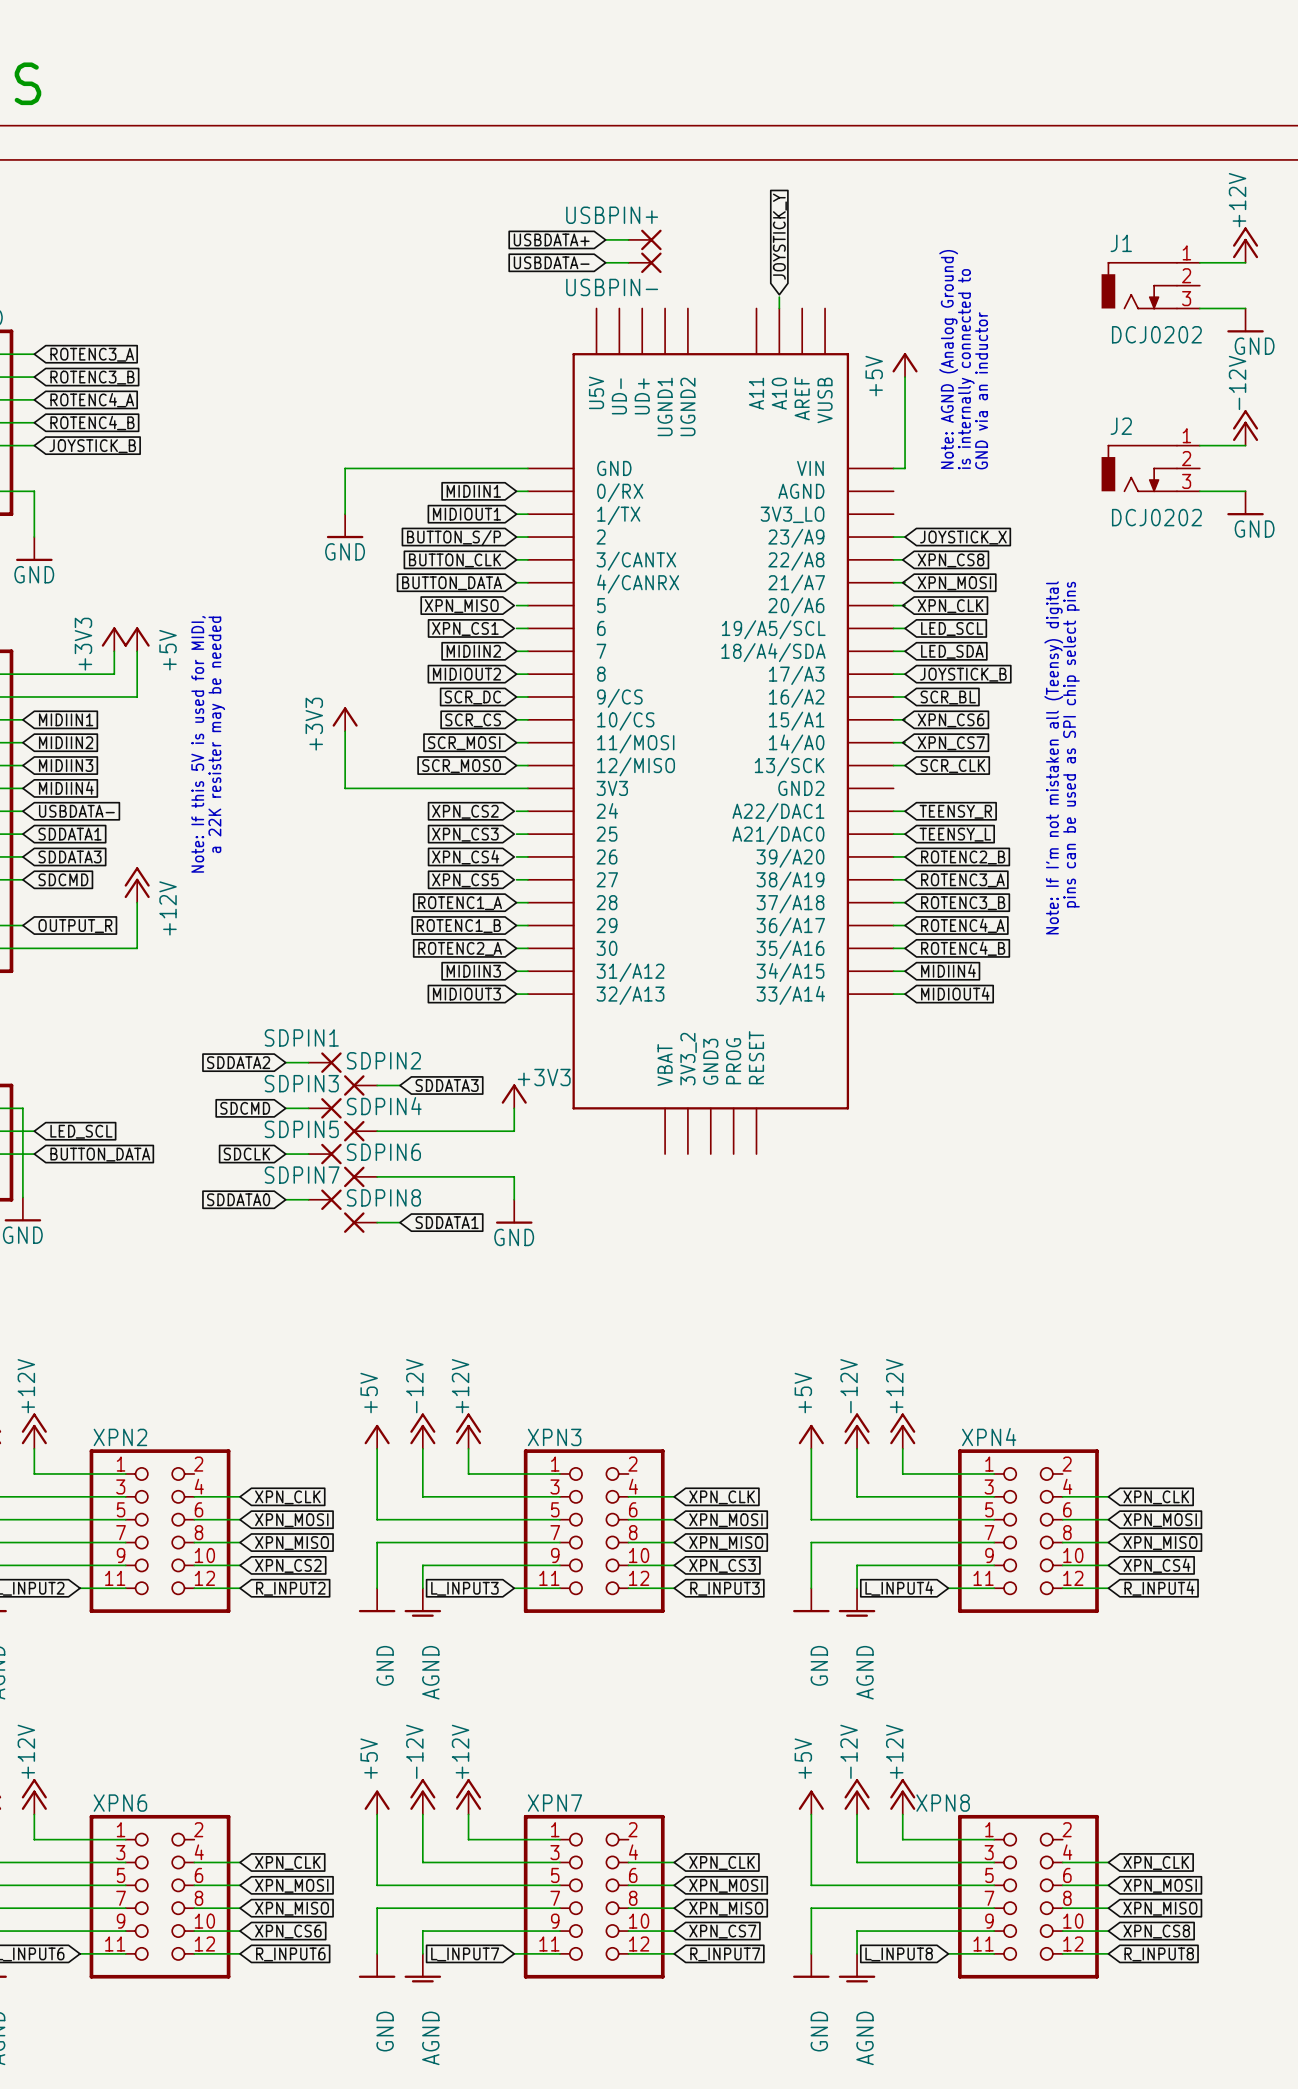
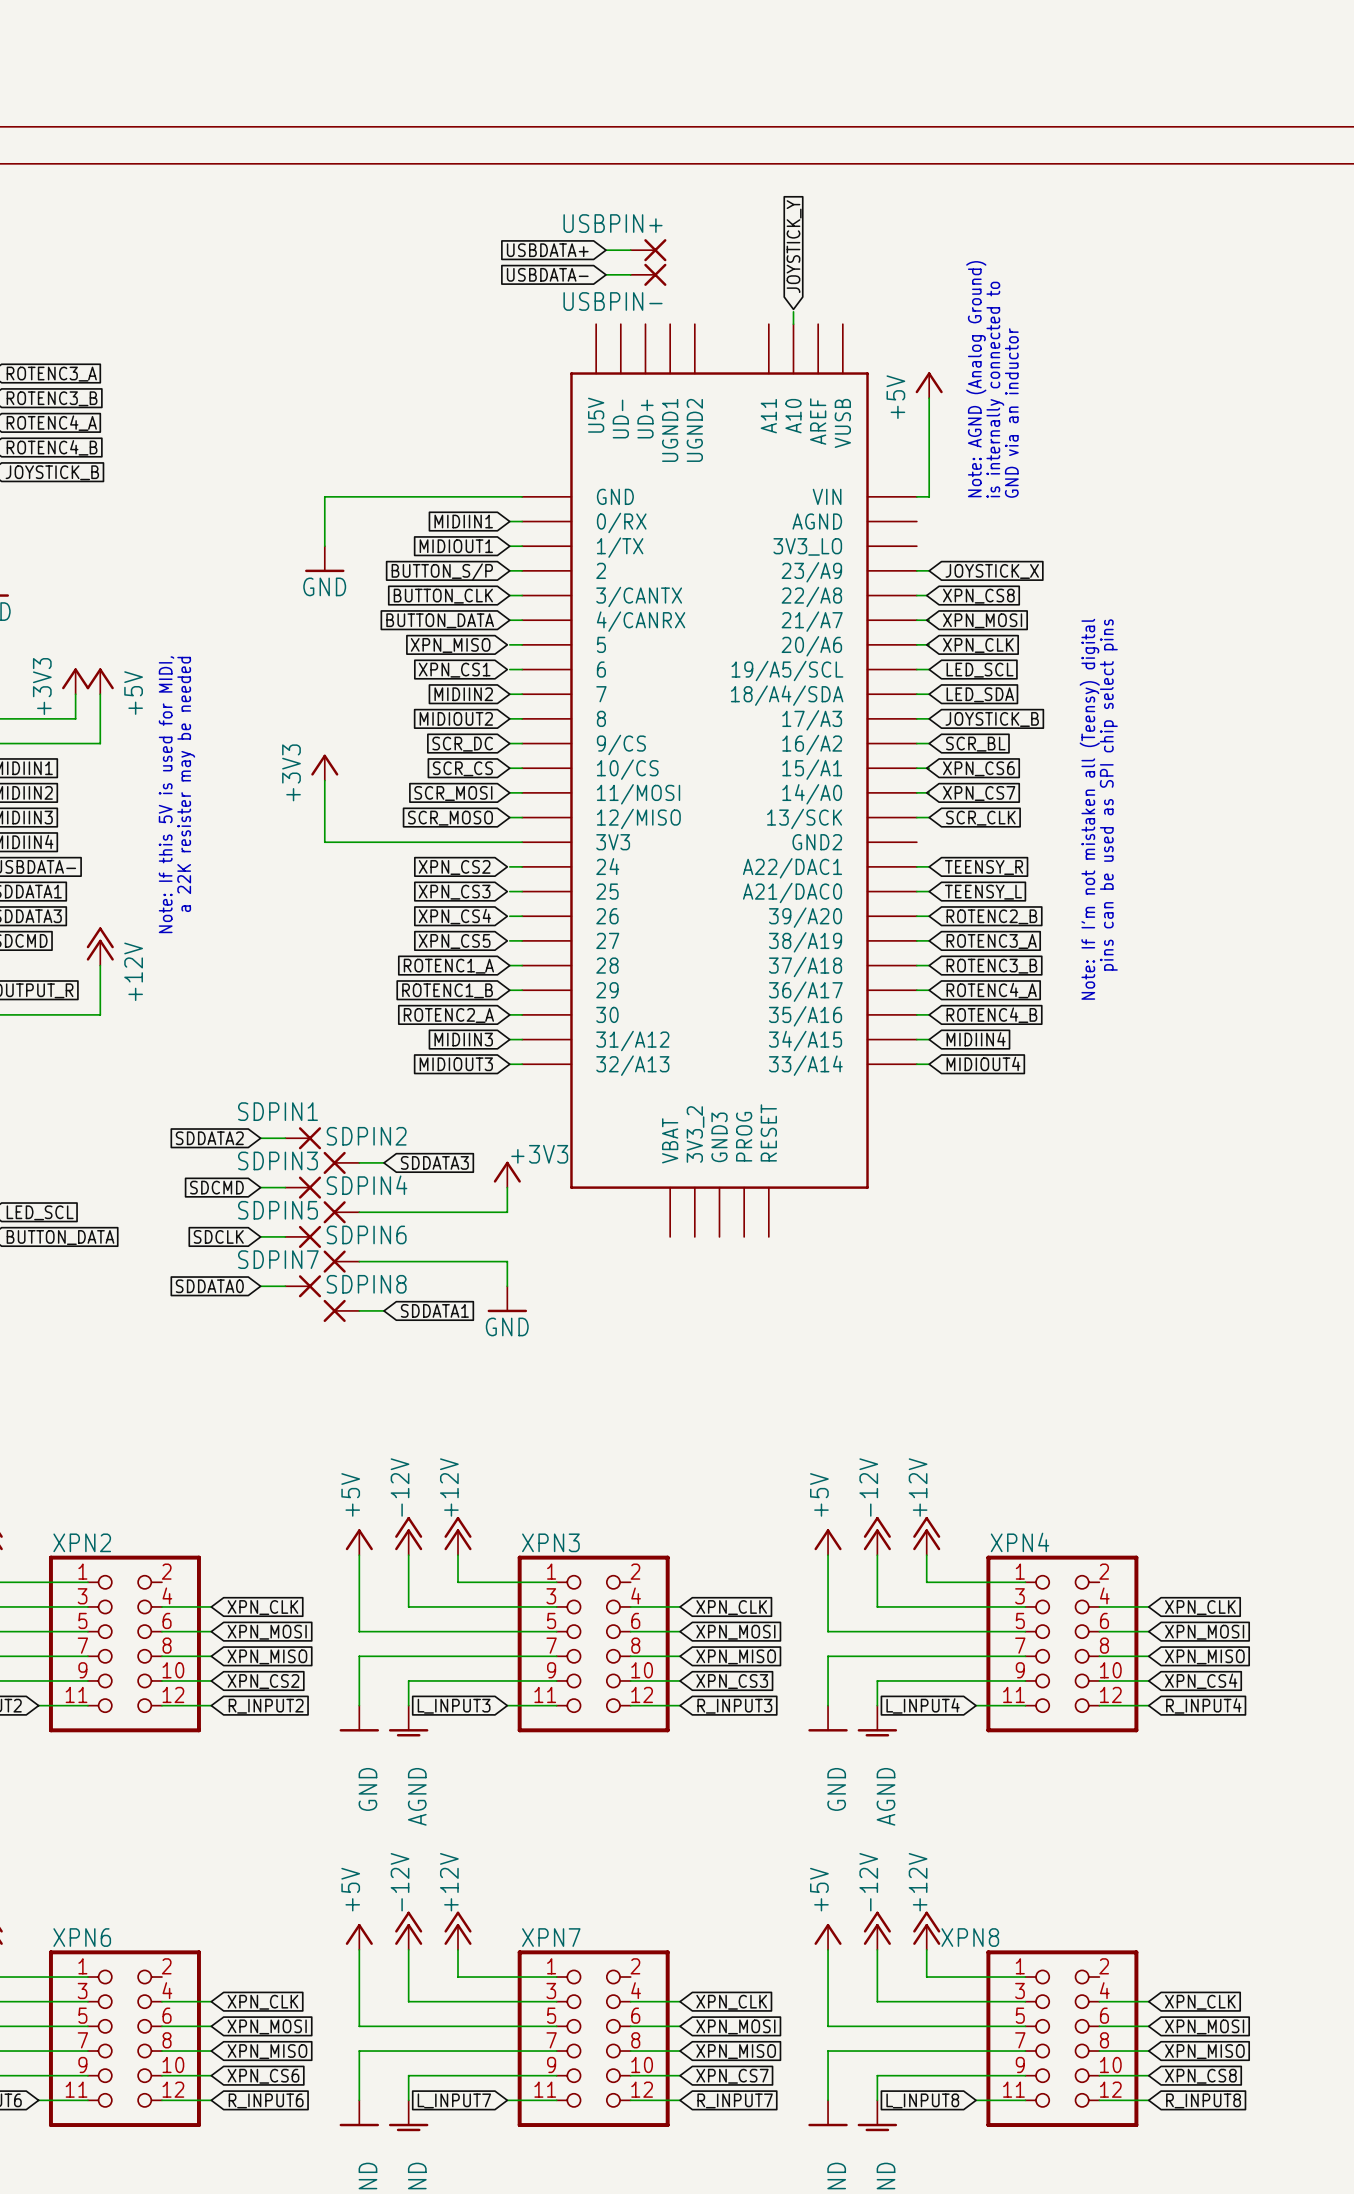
power symbol: +12V (1245, 245) -> none
wire: (1199, 262) (1245, 262) -> none
J1: DCJ0202 (1150, 285) -> none
wire: (1199, 308) (1245, 308) -> none
power symbol: GND (1245, 320) -> none
power symbol: -12V (1245, 427) -> none
wire: (1199, 445) (1245, 445) -> none
J2: DCJ0202 (1150, 468) -> none
wire: (1199, 491) (1245, 491) -> none
power symbol: GND (1245, 503) -> none

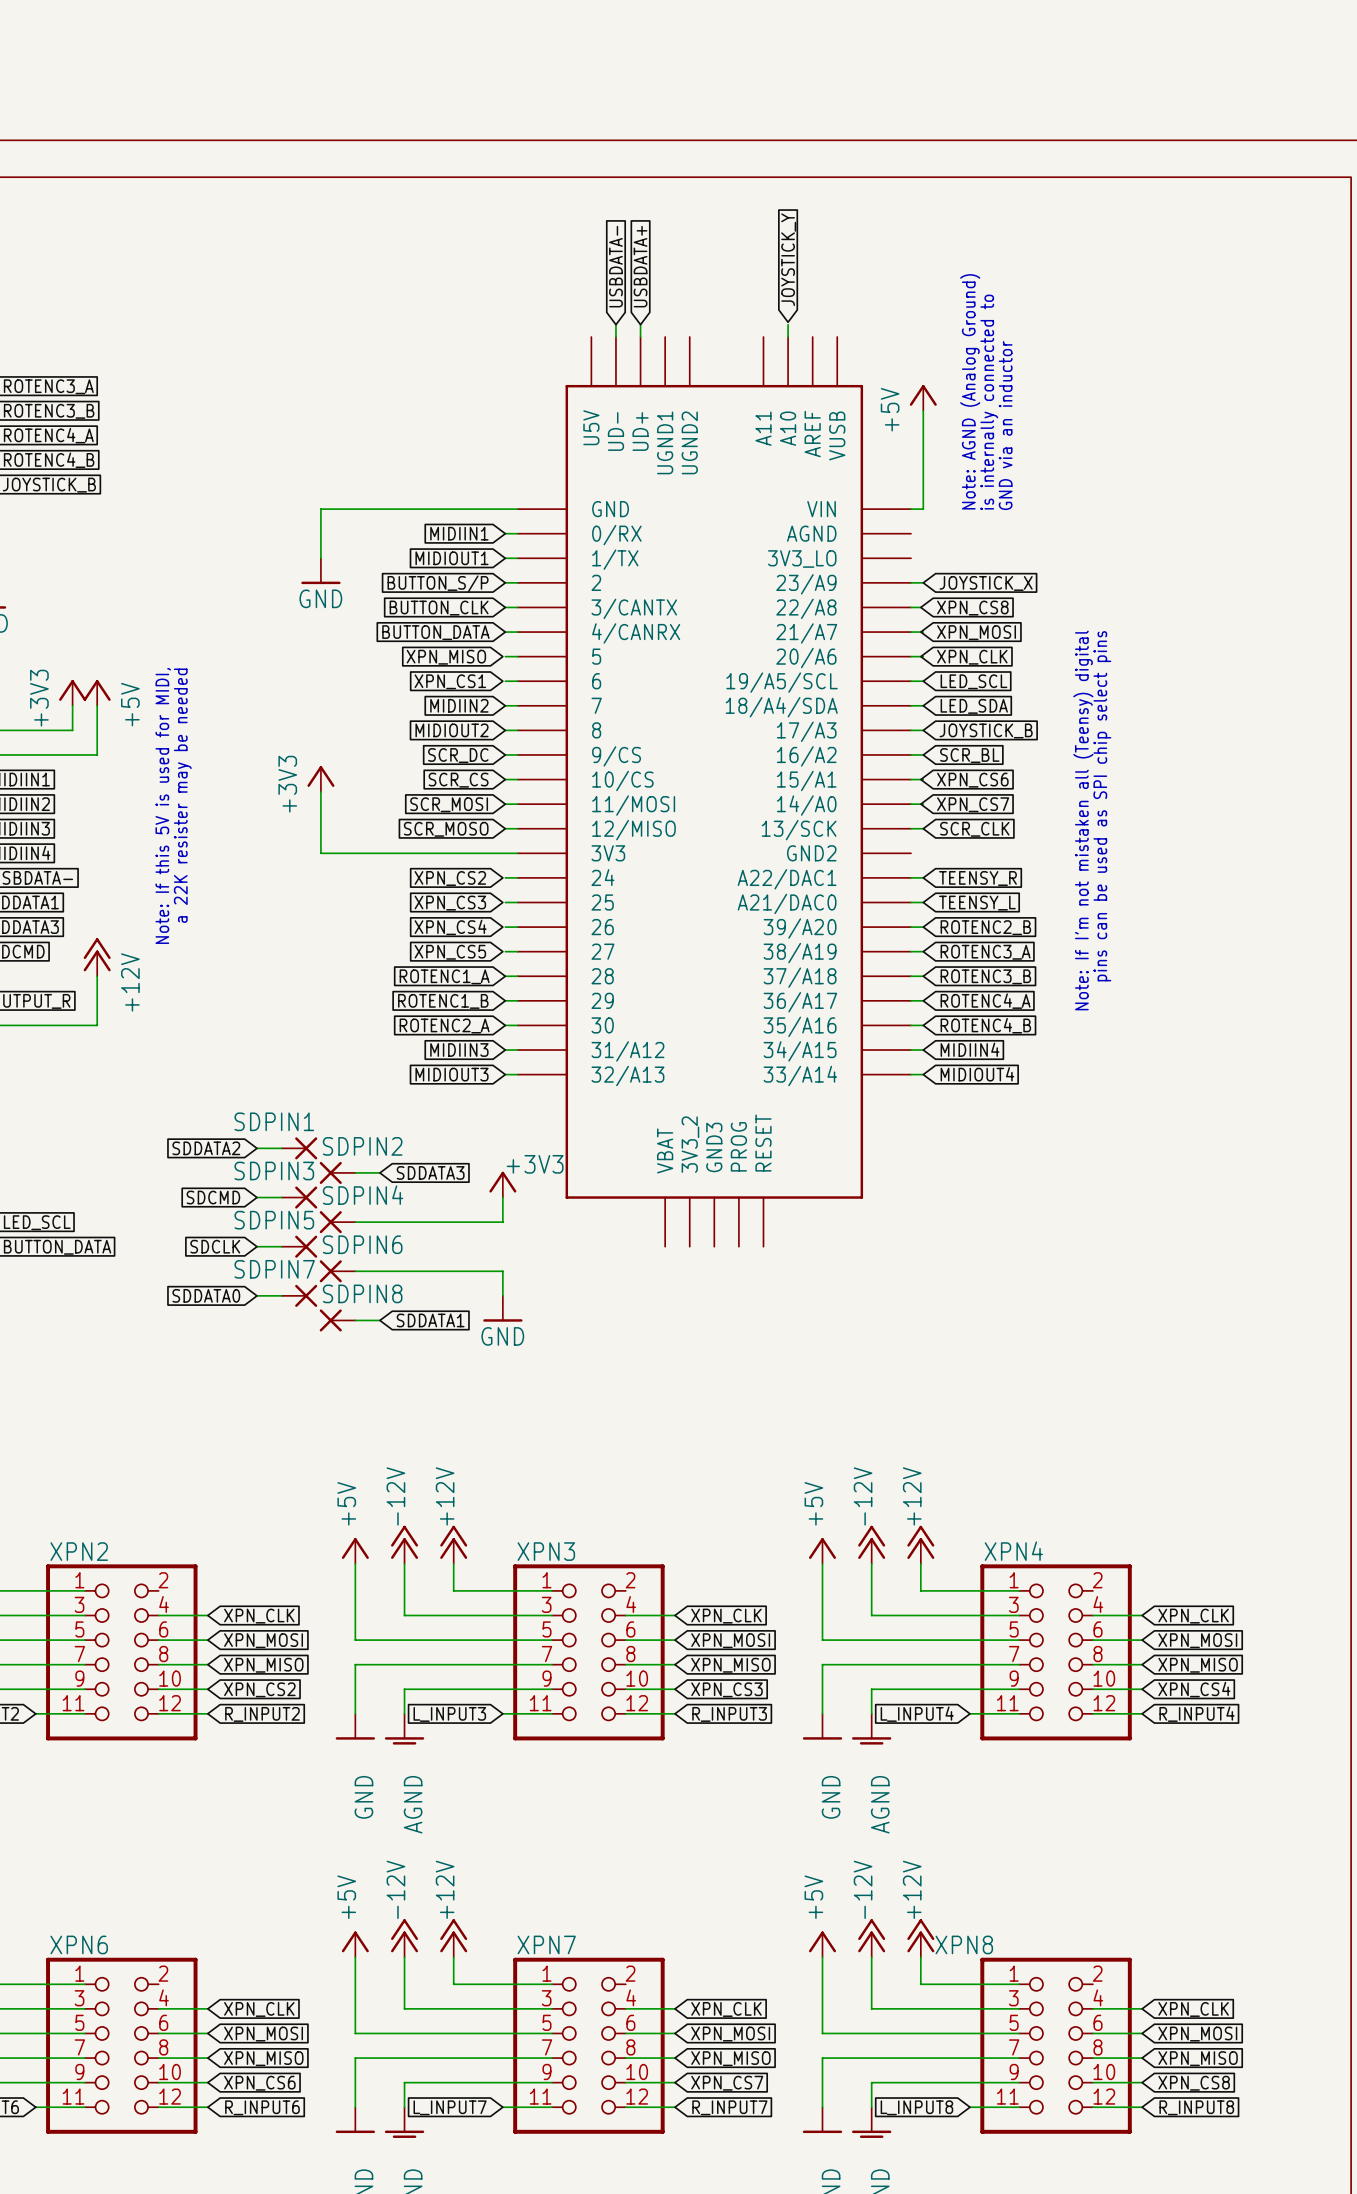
global label rotation: 0° (547, 250) -> 90° clockwise (640, 266)
wire: (606, 250) (630, 250) -> none
USBPIN+: (648, 250) -> none
global label rotation: 0° (547, 274) -> 90° clockwise (615, 266)
wire: (606, 274) (630, 274) -> none
USBPIN-: (648, 274) -> none
wire: none -> (615, 324) (615, 337)
wire: none -> (640, 324) (640, 337)

